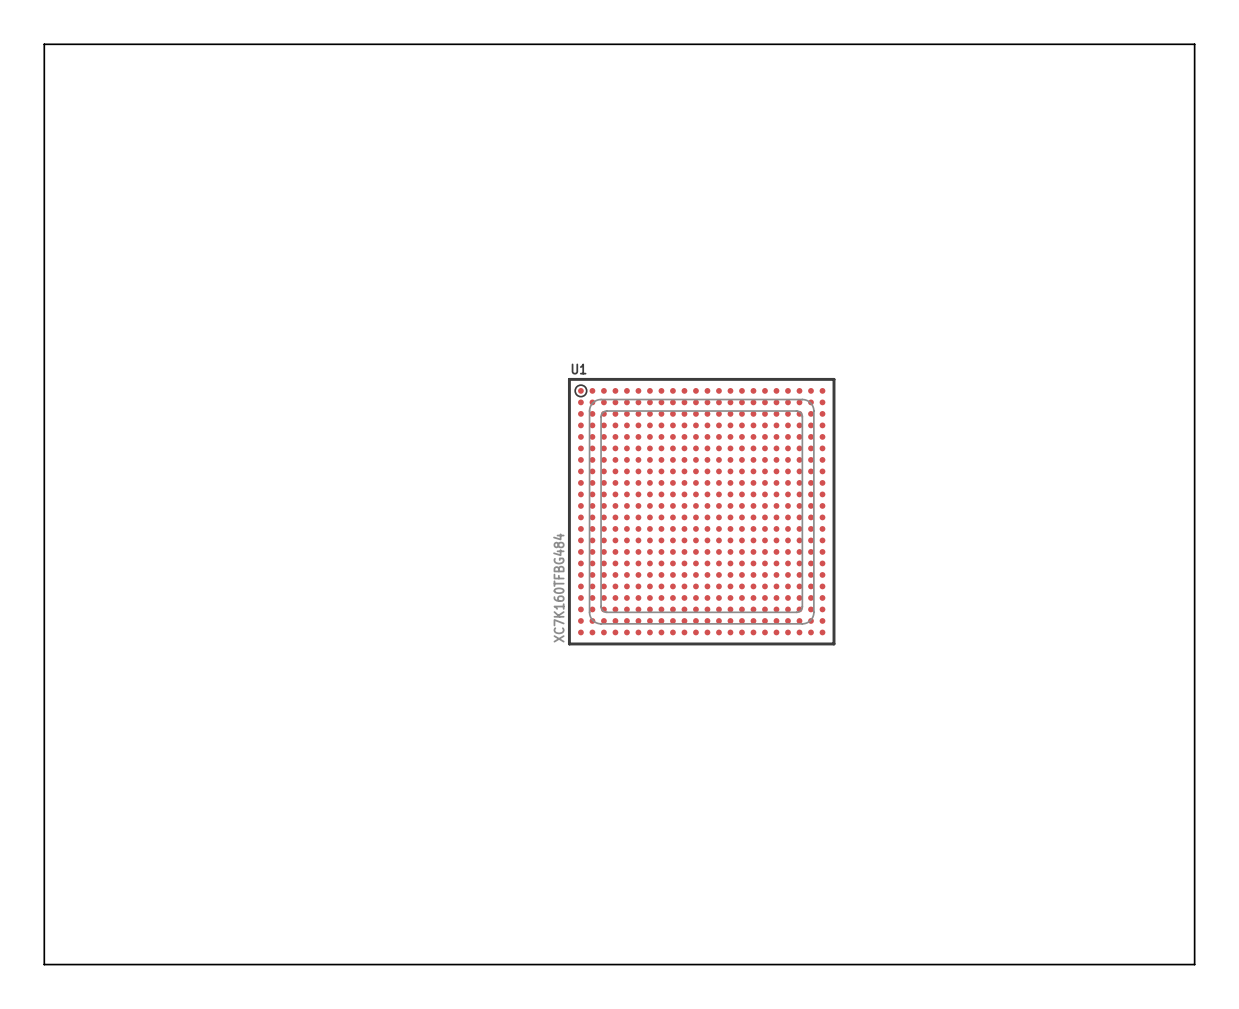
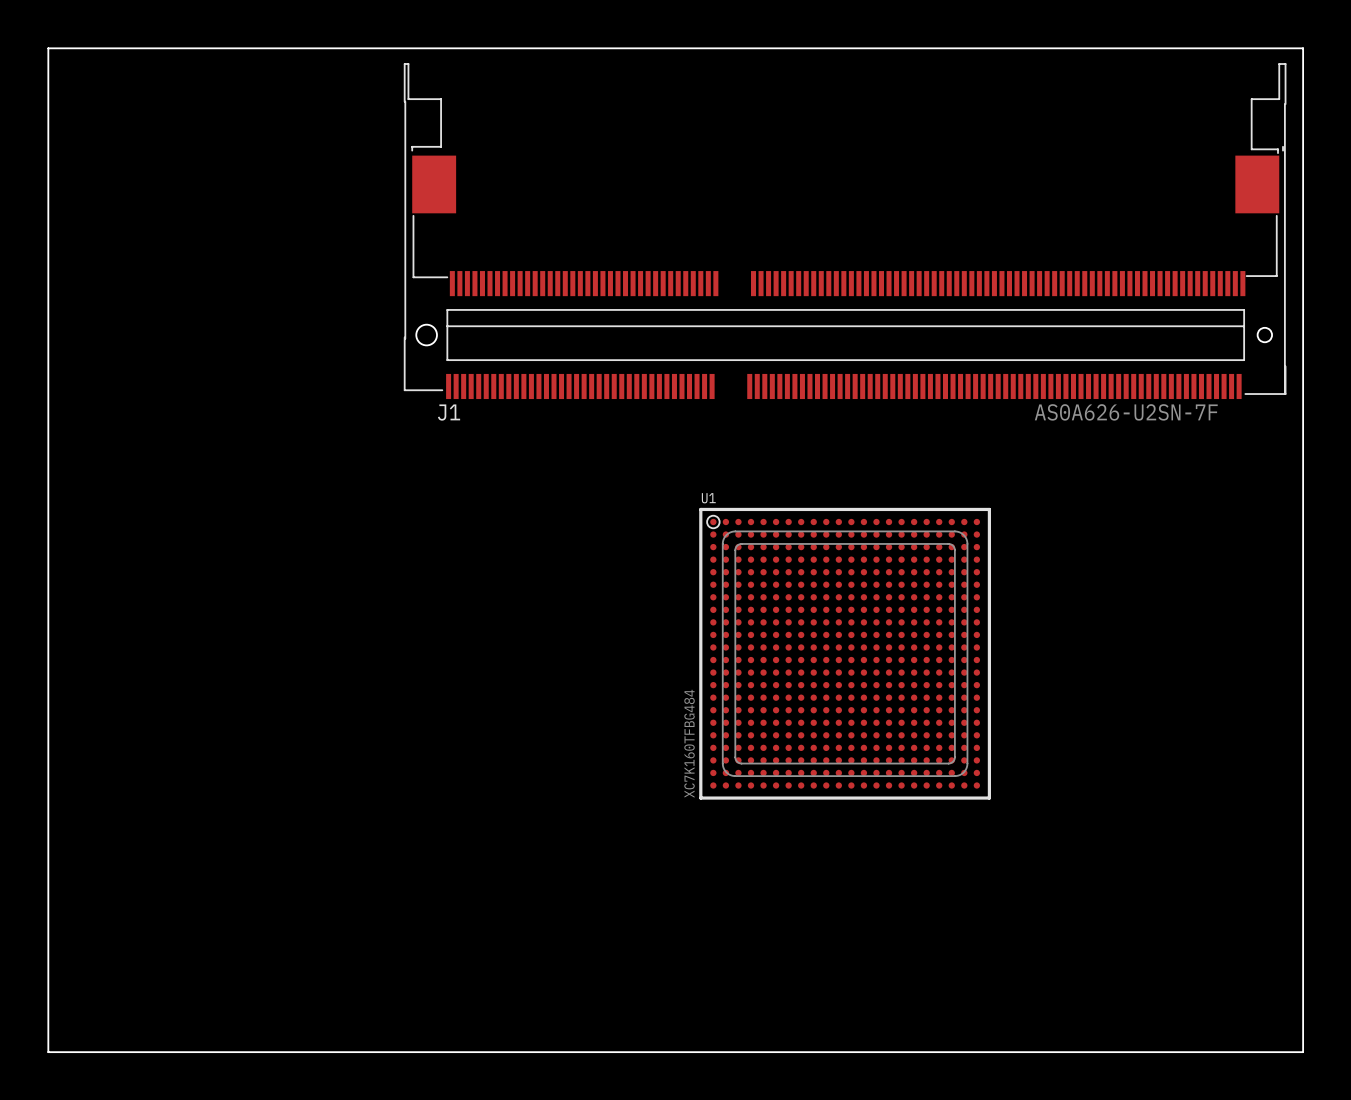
J1: none -> AS0A626-U2SN-7F (845, 231)
U1 position: (701, 511) -> (845, 653)

